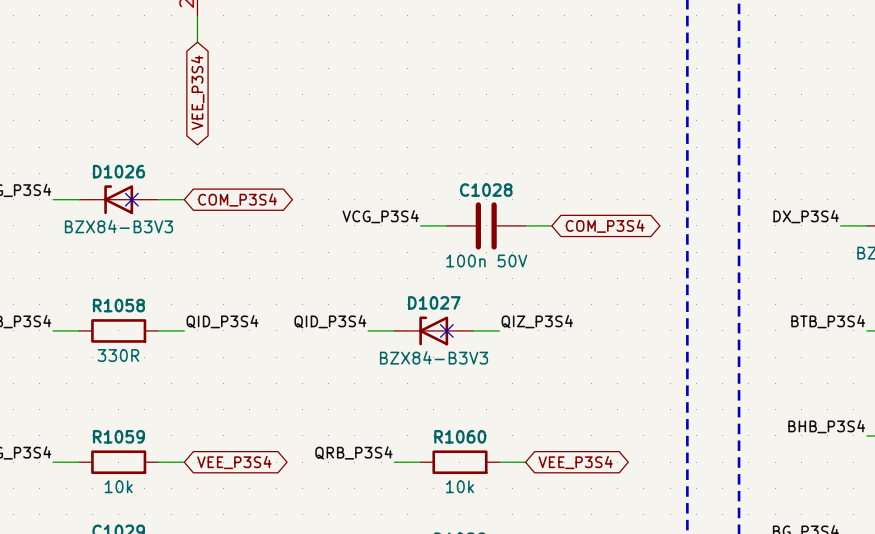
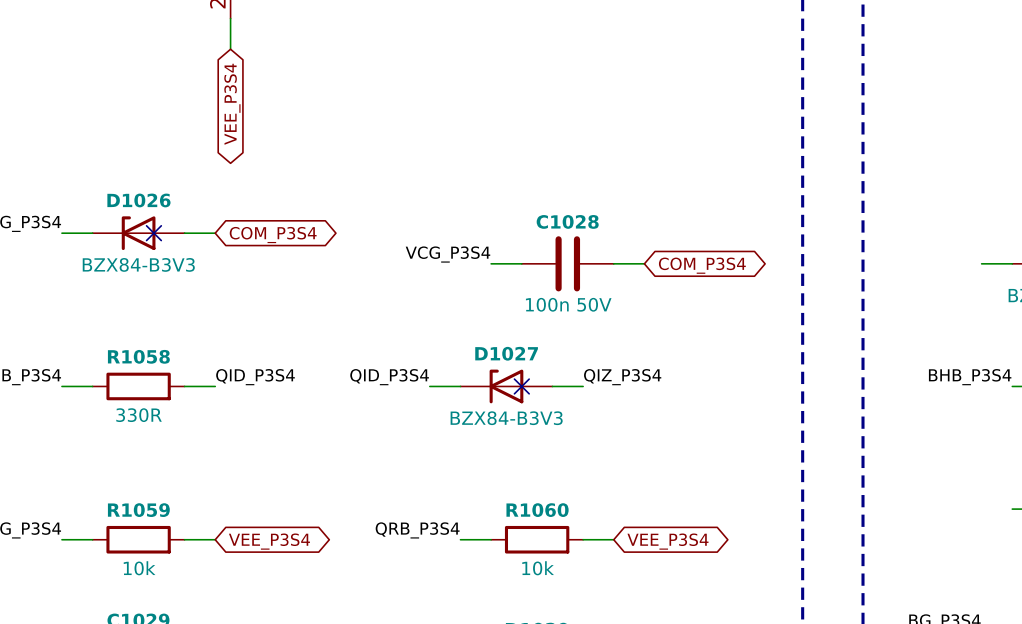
label: DX_P3S4 (806, 216) -> none
label: BTB_P3S4 (828, 321) -> BHB_P3S4 (970, 377)
label: BHB_P3S4 (826, 426) -> none

